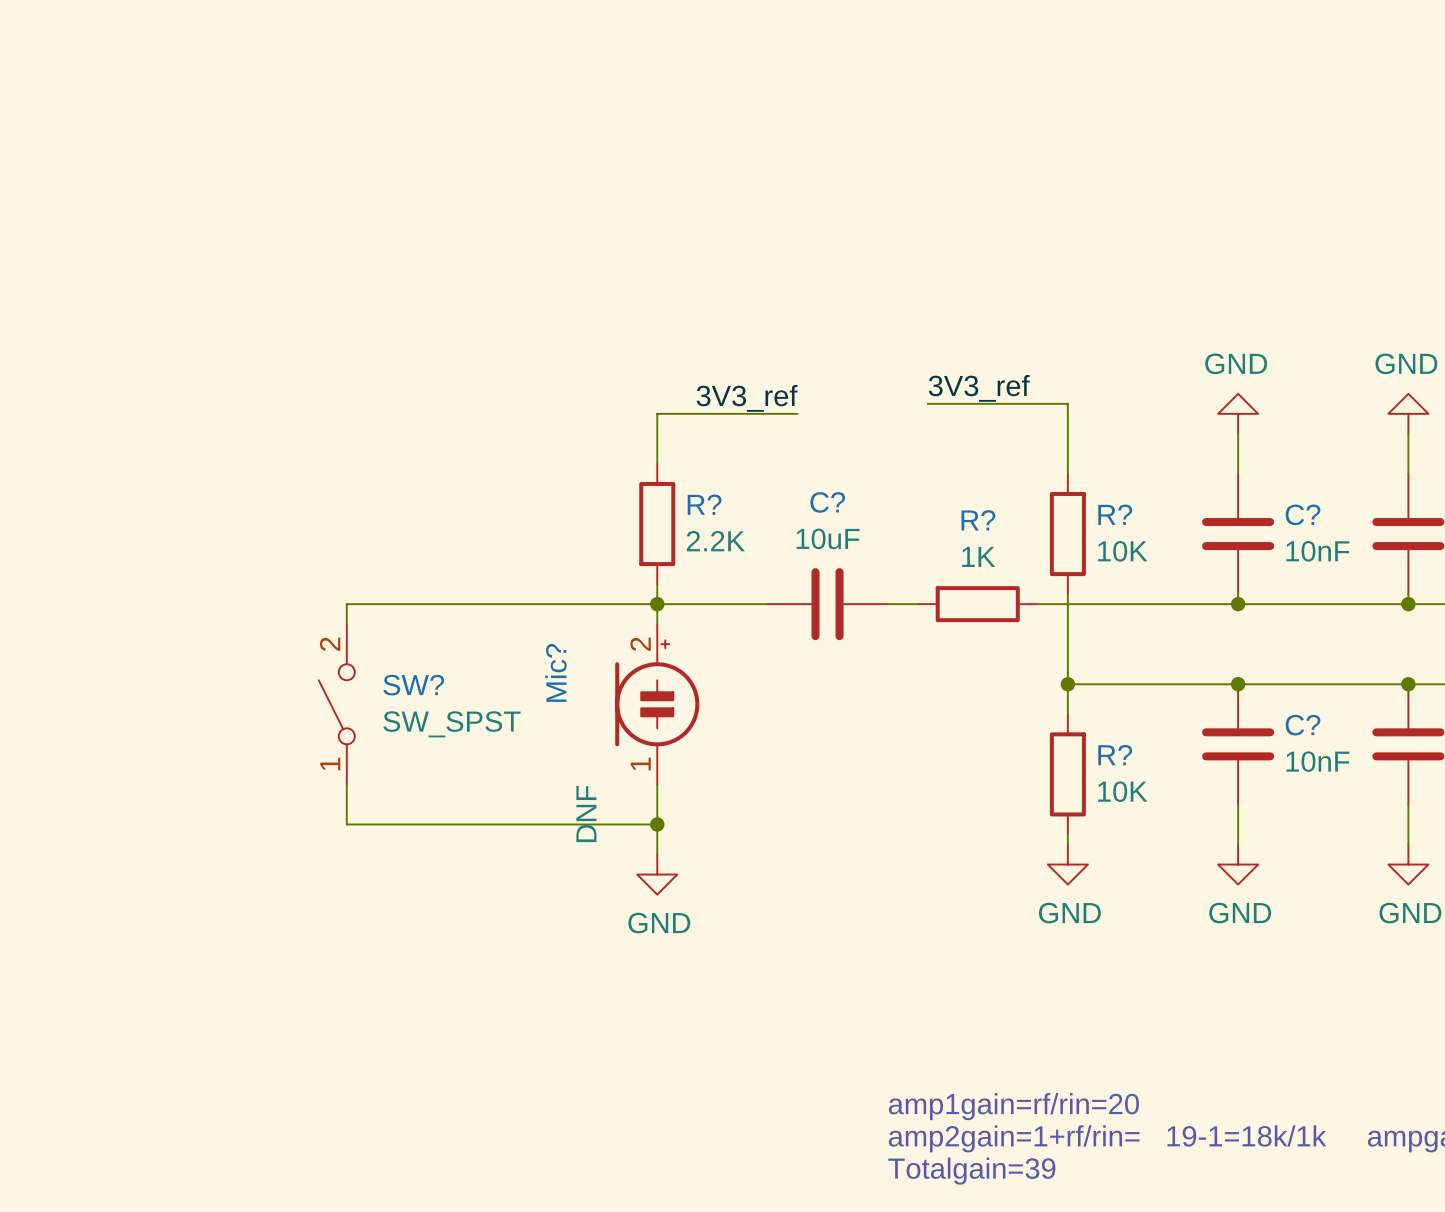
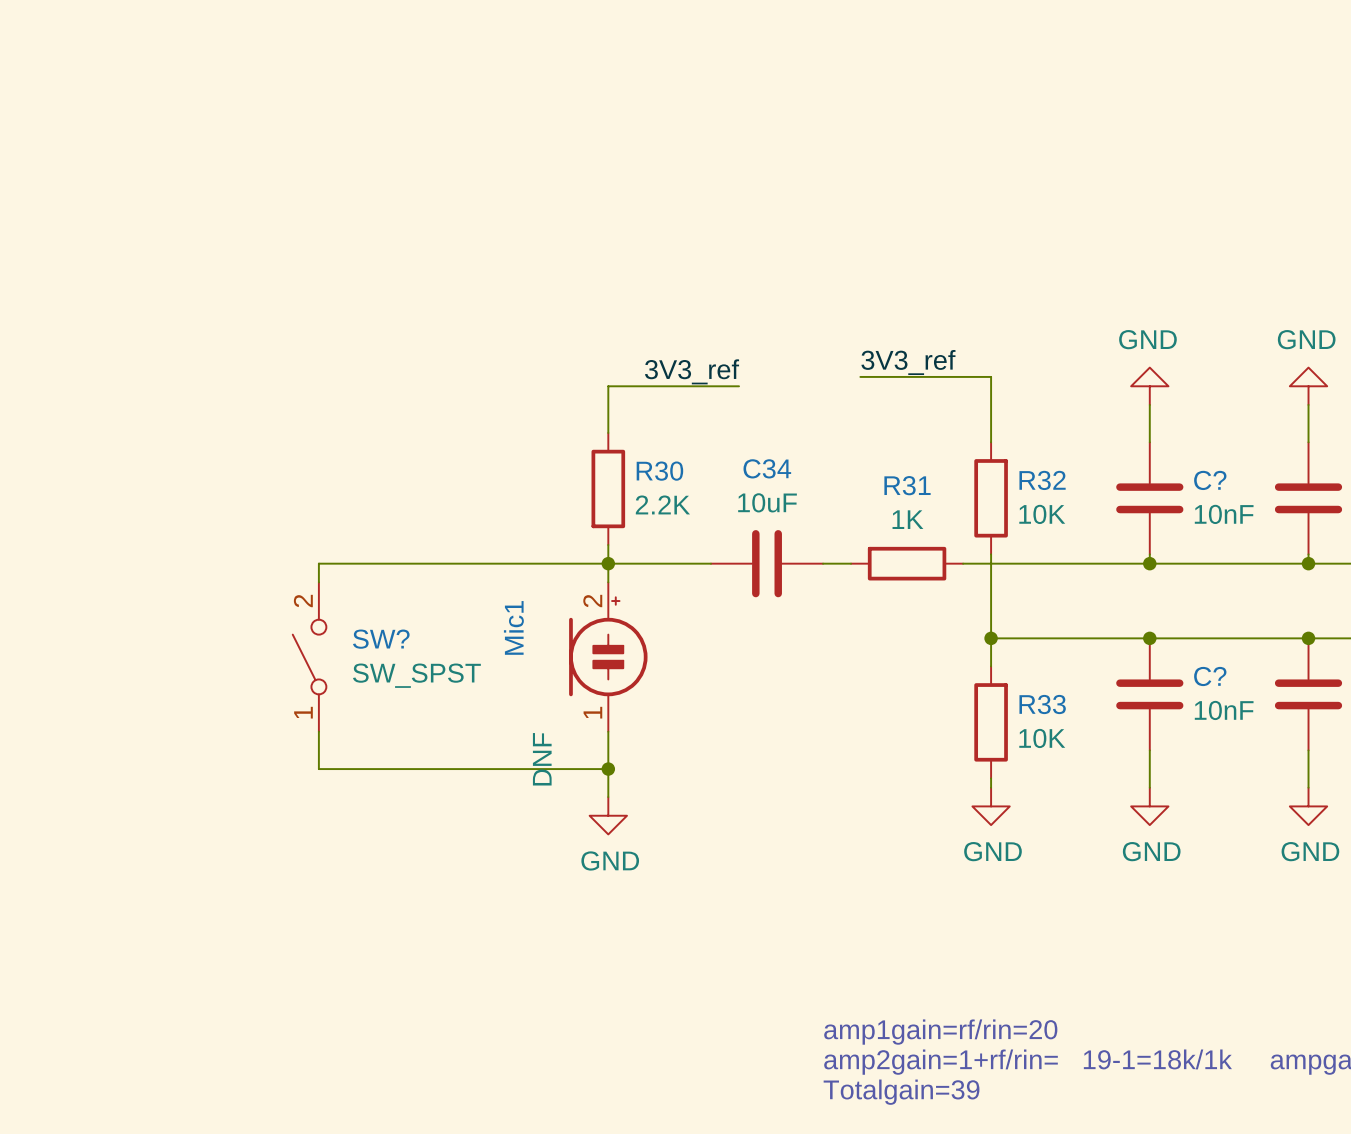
C? name: C? (827, 502) -> C34 (767, 468)
R? name: R? (704, 504) -> R30 (659, 471)
R? name: R? (1115, 514) -> R32 (1042, 480)
R? name: R? (978, 520) -> R31 (907, 485)
Mic? name: Mic? (555, 672) -> Mic1 (513, 627)
R? name: R? (1115, 755) -> R33 (1042, 704)

